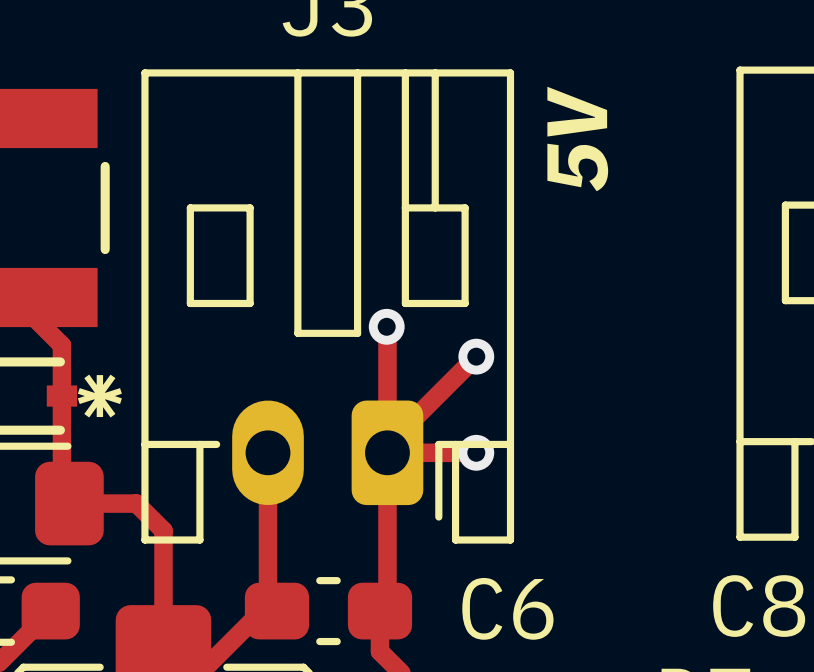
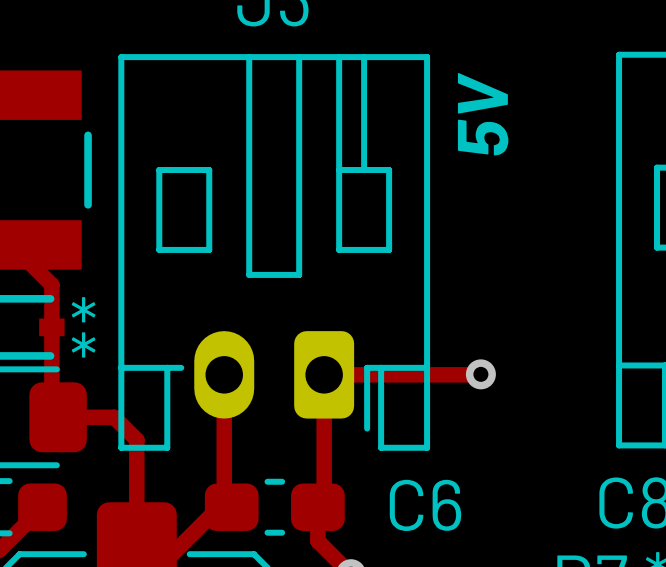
via: (386, 326) -> none
track: (387, 327) (387, 452) -> none
track: (476, 356) (387, 445) -> none
via: (476, 356) -> none
track: none -> (398, 374) (480, 374)
via: (476, 452) -> none
via: none -> (480, 374)

